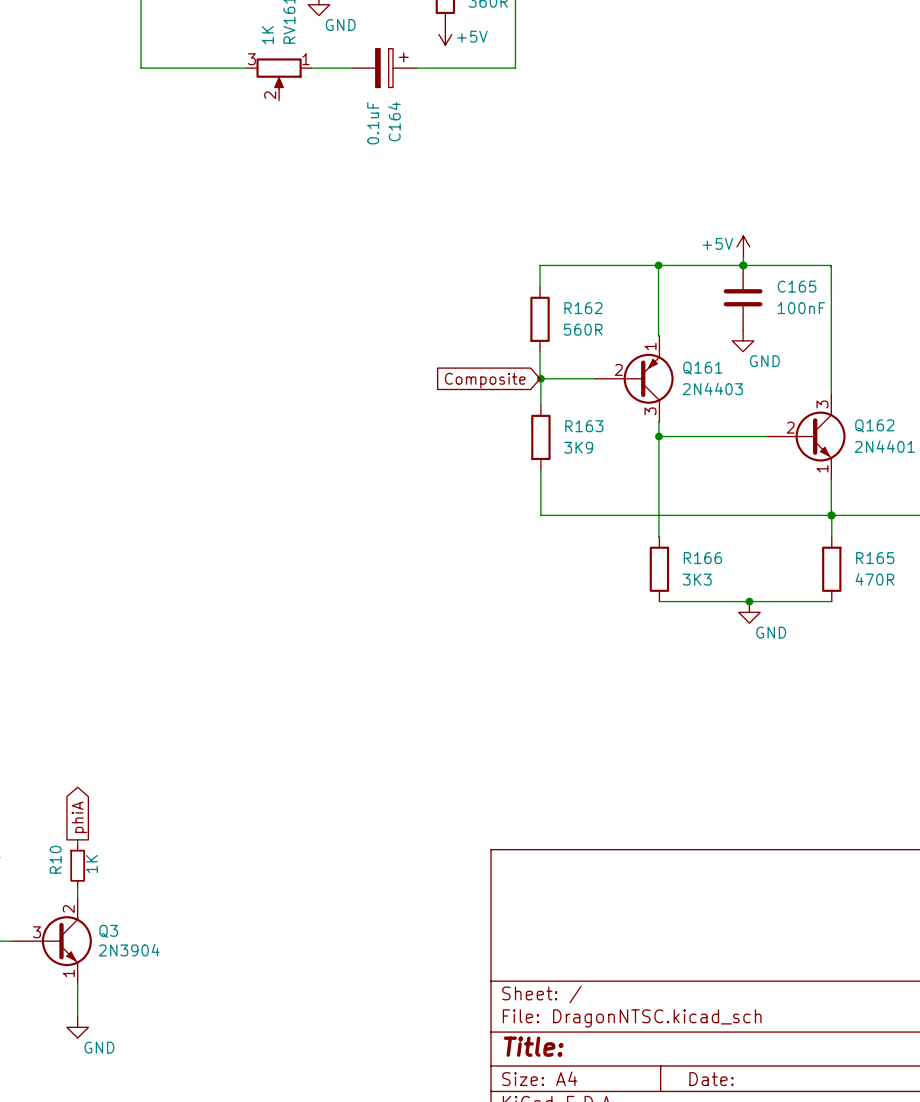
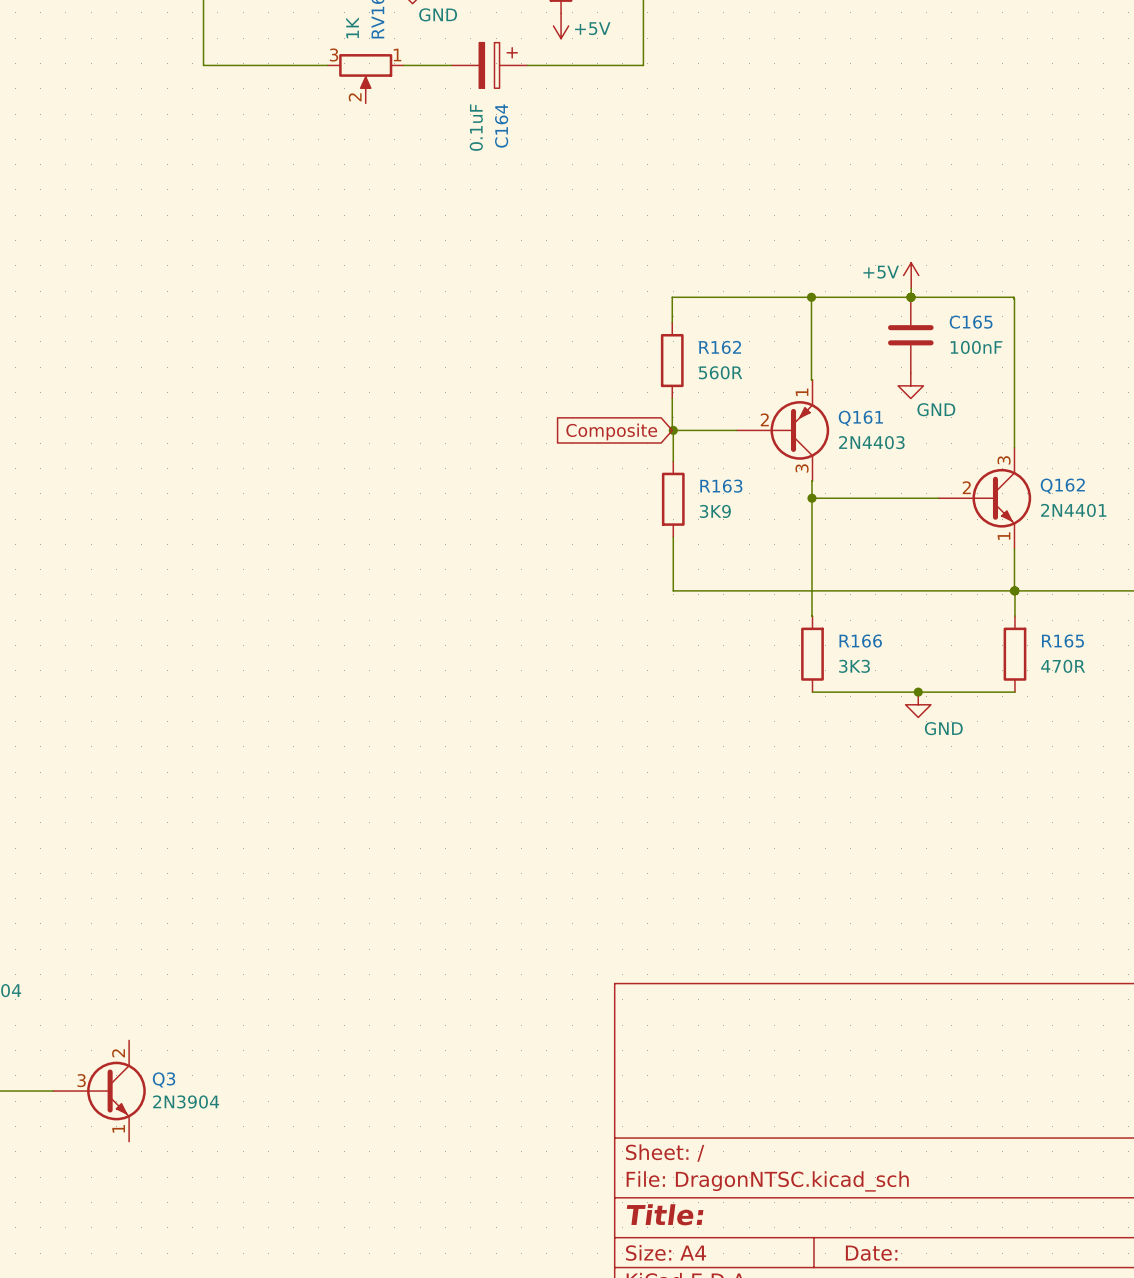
global label: phiA (79, 817) -> none
wire: (77, 839) (77, 844) -> none
R10: 1K (77, 865) -> none
wire: (77, 887) (77, 898) -> none
wire: (77, 984) (77, 1016) -> none
power symbol: GND (77, 1027) -> none

